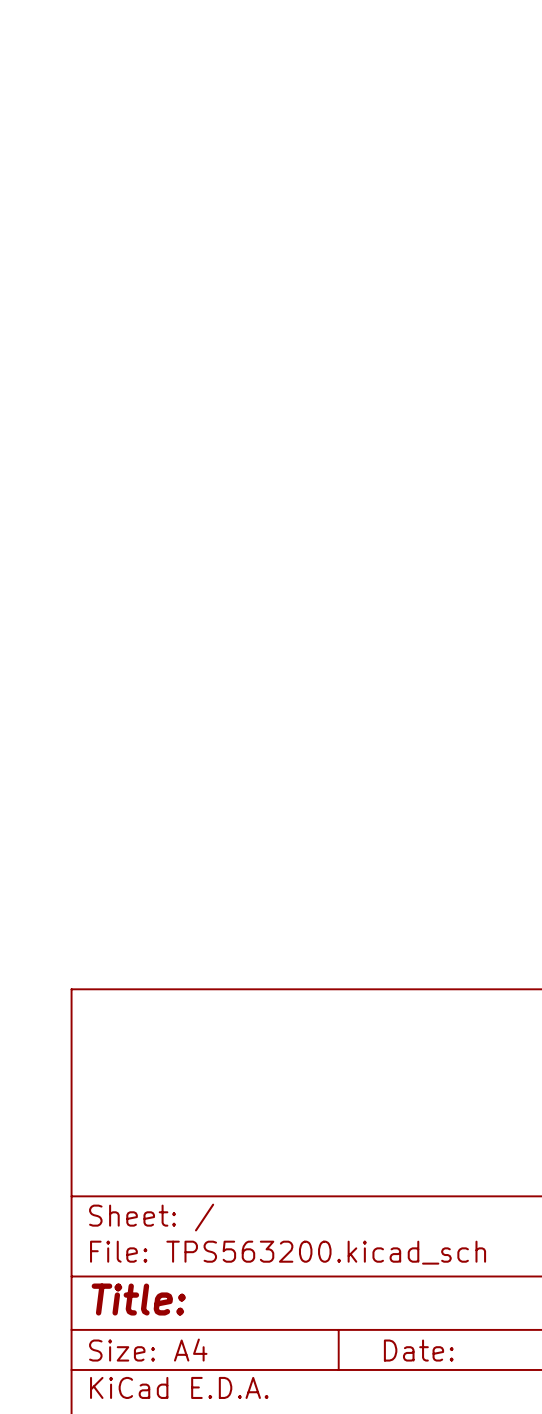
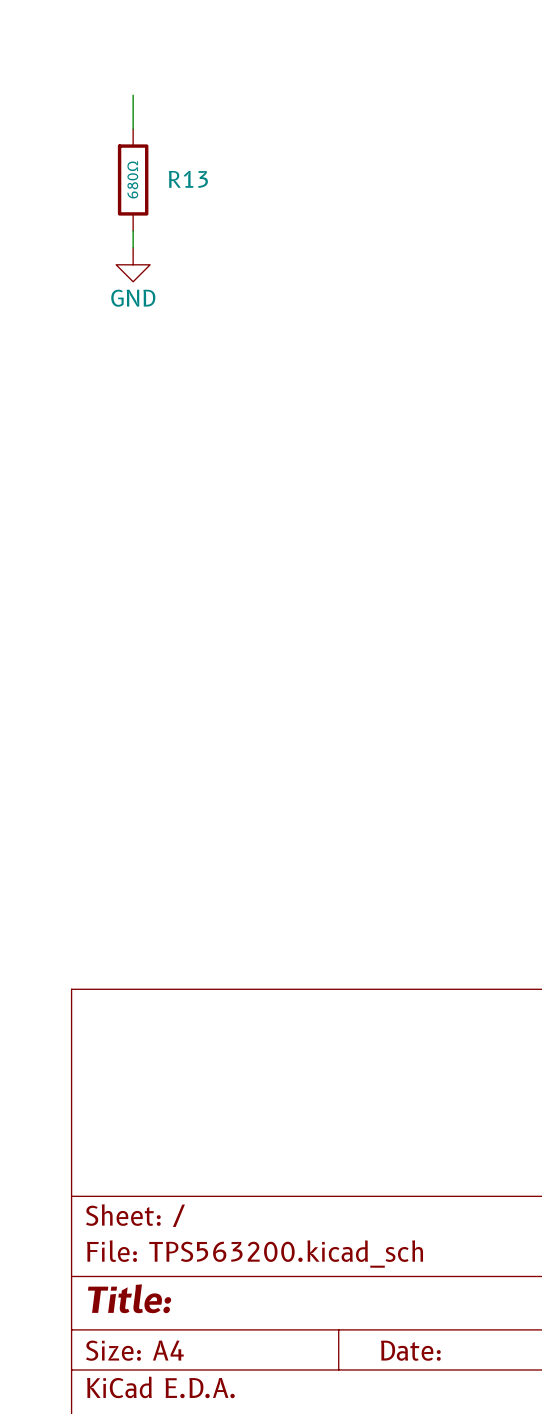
wire: none -> (133, 95) (133, 129)
R13: none -> 680Ω (133, 179)
wire: none -> (133, 230) (133, 247)
power symbol: none -> GND (133, 264)

